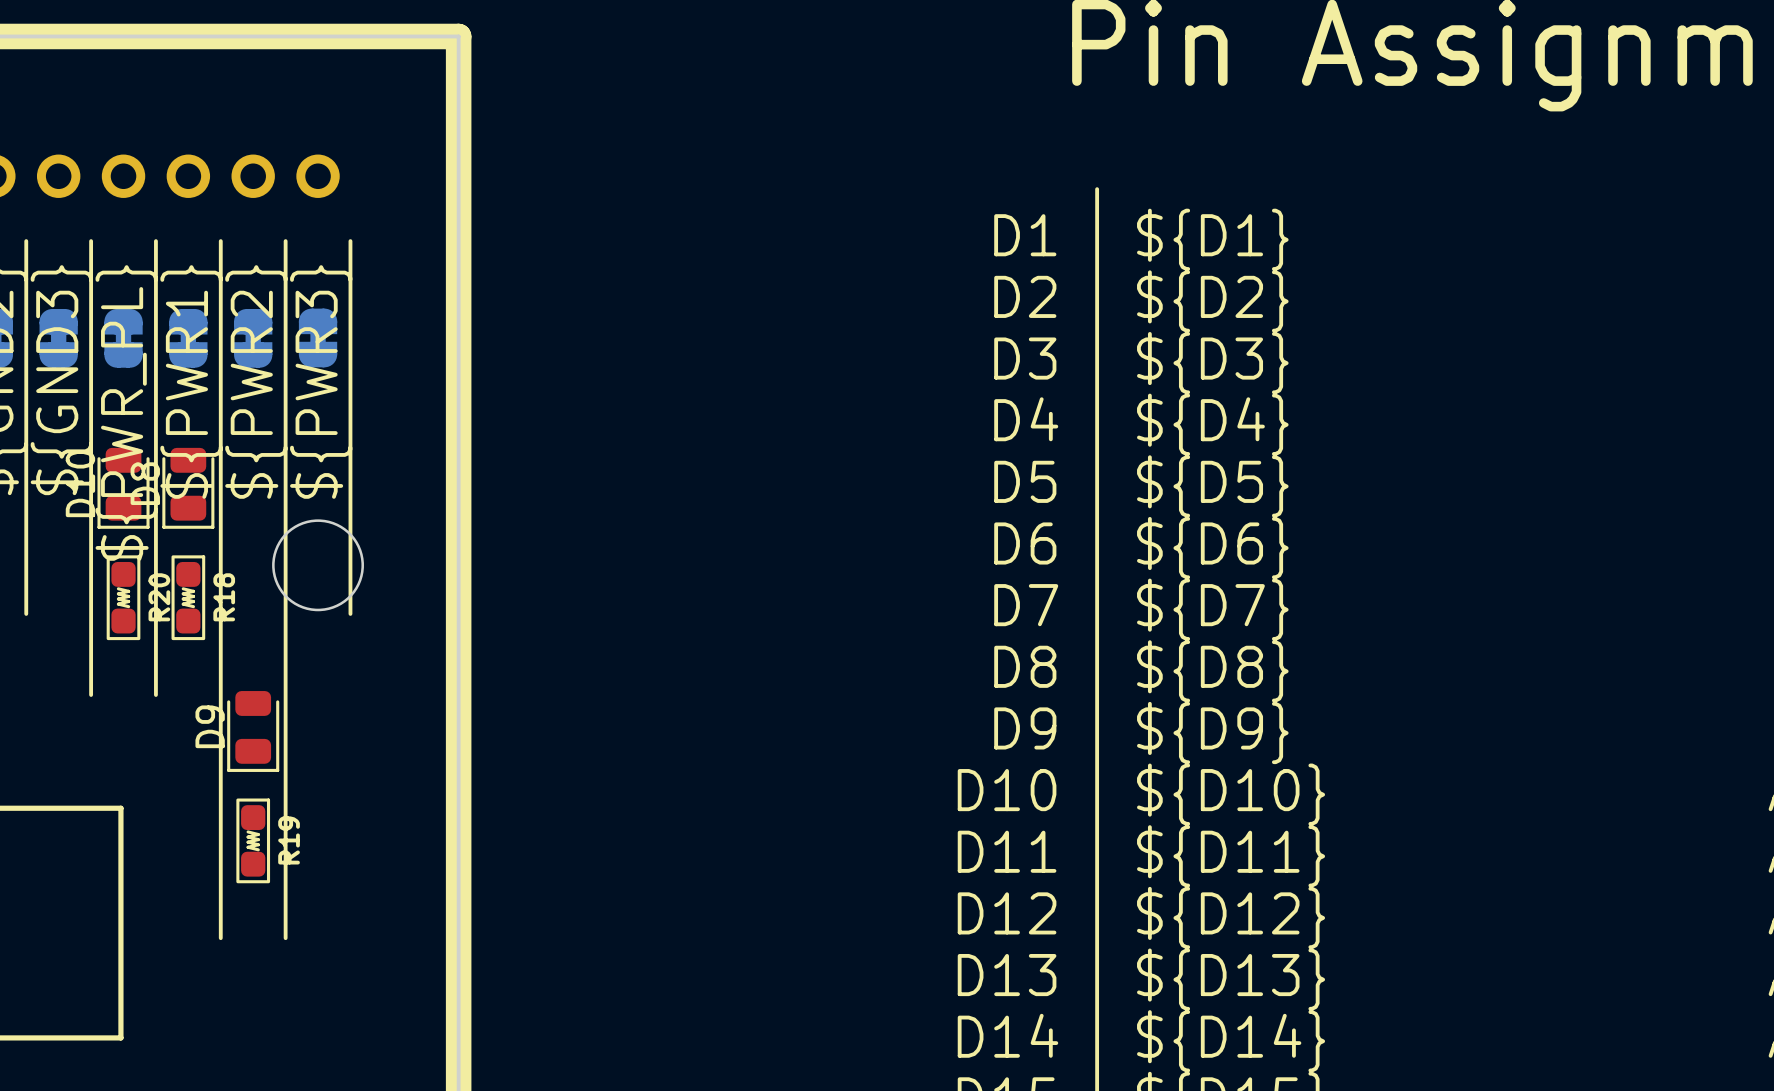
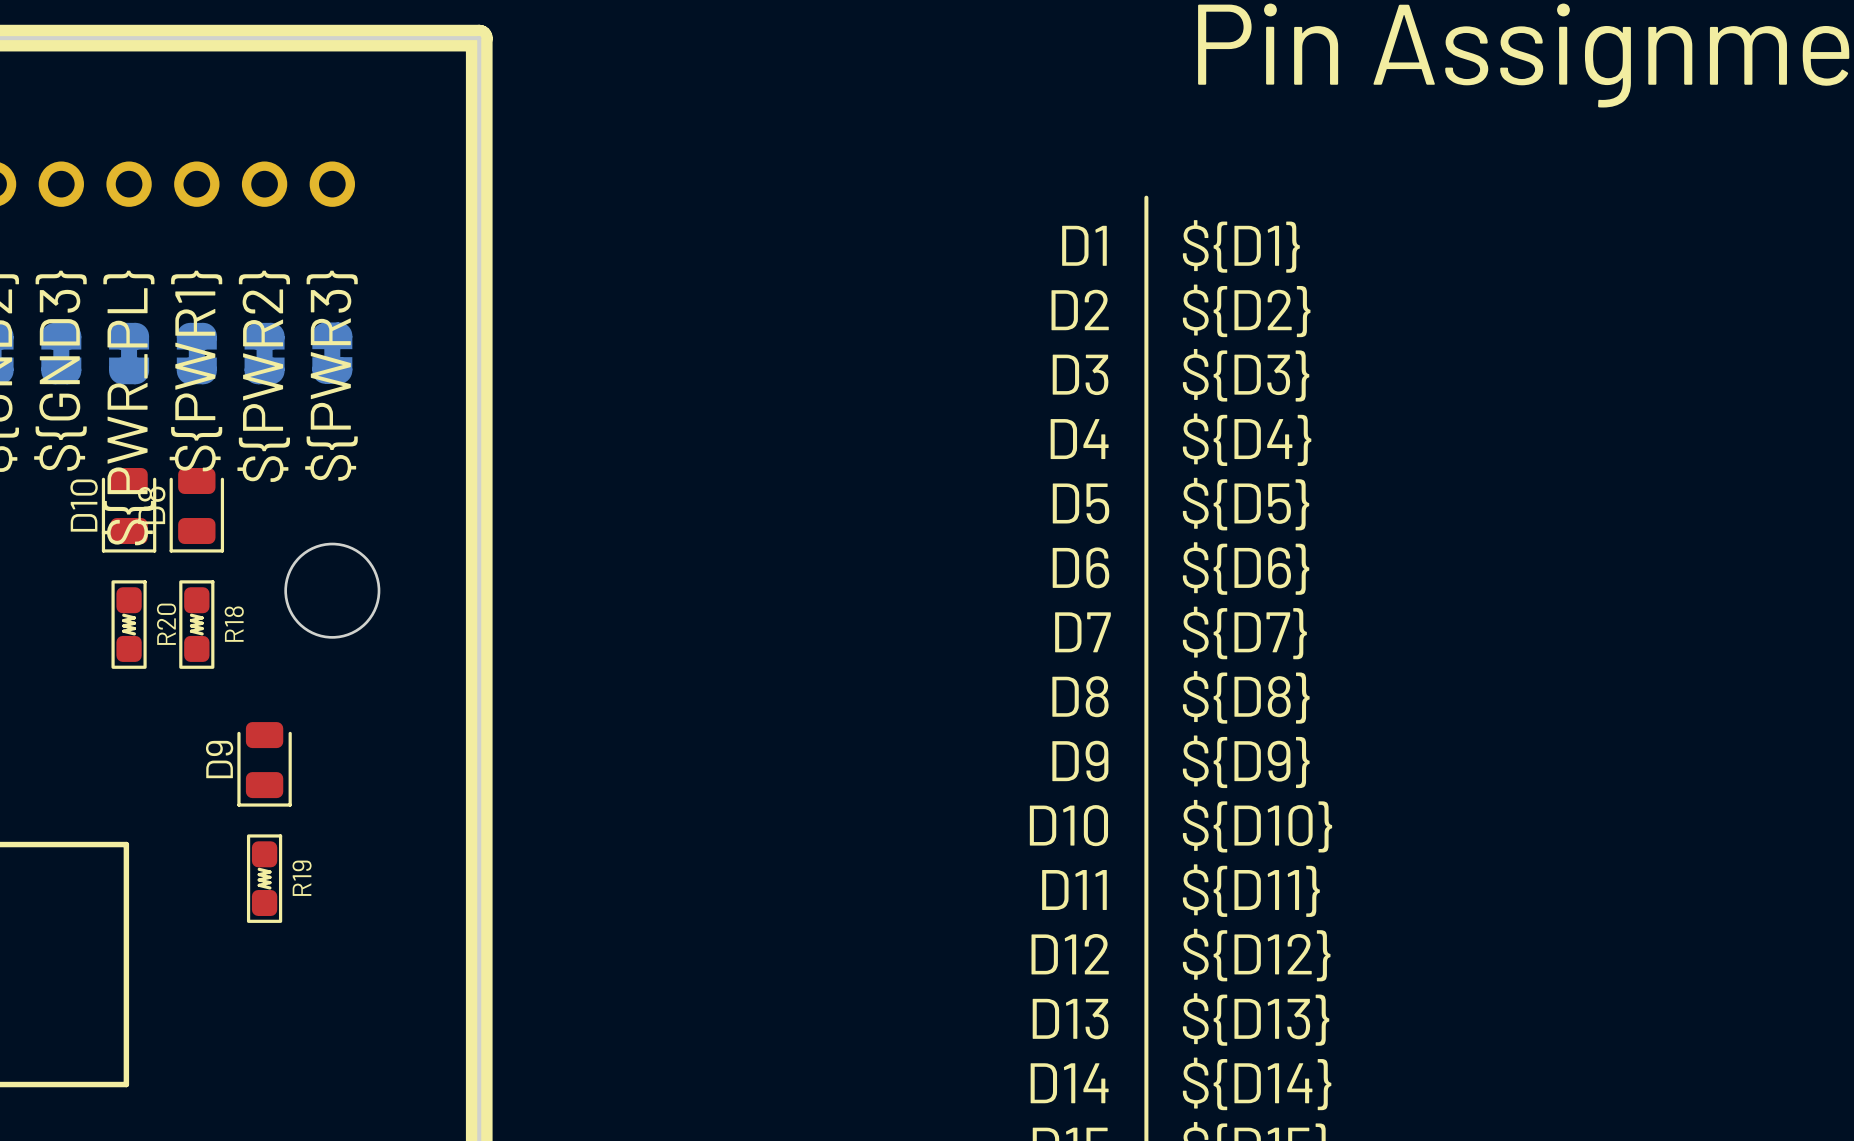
line: (26, 241) (26, 613) -> none
line: (91, 241) (91, 694) -> none
line: (155, 241) (155, 694) -> none
line: (220, 241) (220, 938) -> none
line: (285, 241) (285, 938) -> none
line: (350, 241) (350, 613) -> none

